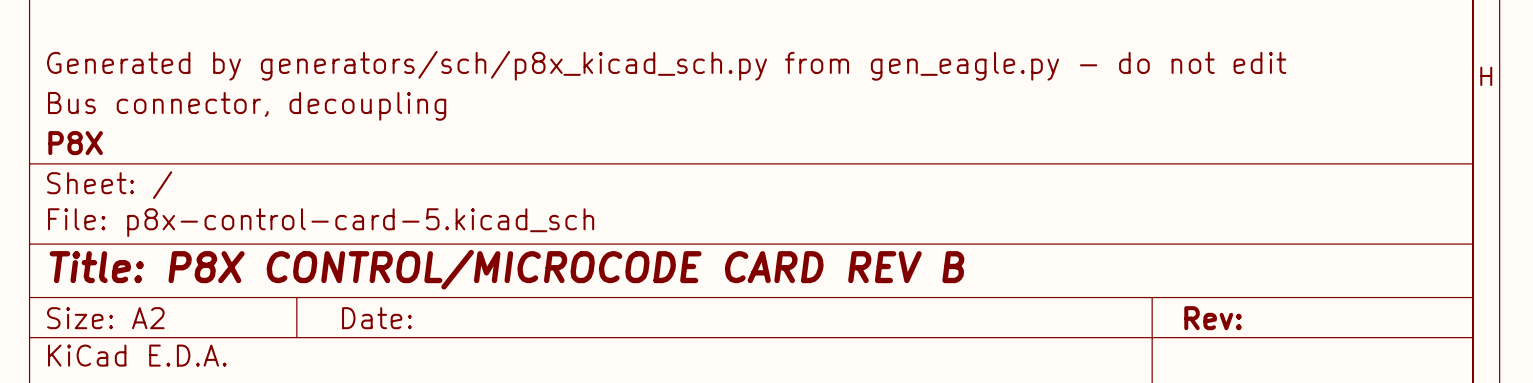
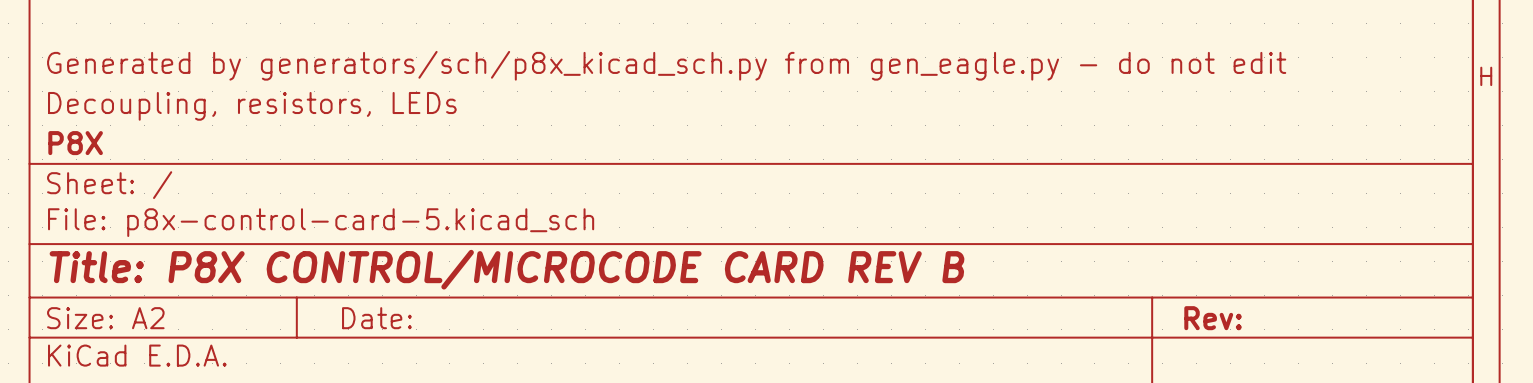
title block: Bus connector, decoupling (247, 106) -> Decoupling, resistors, LEDs (252, 106)

